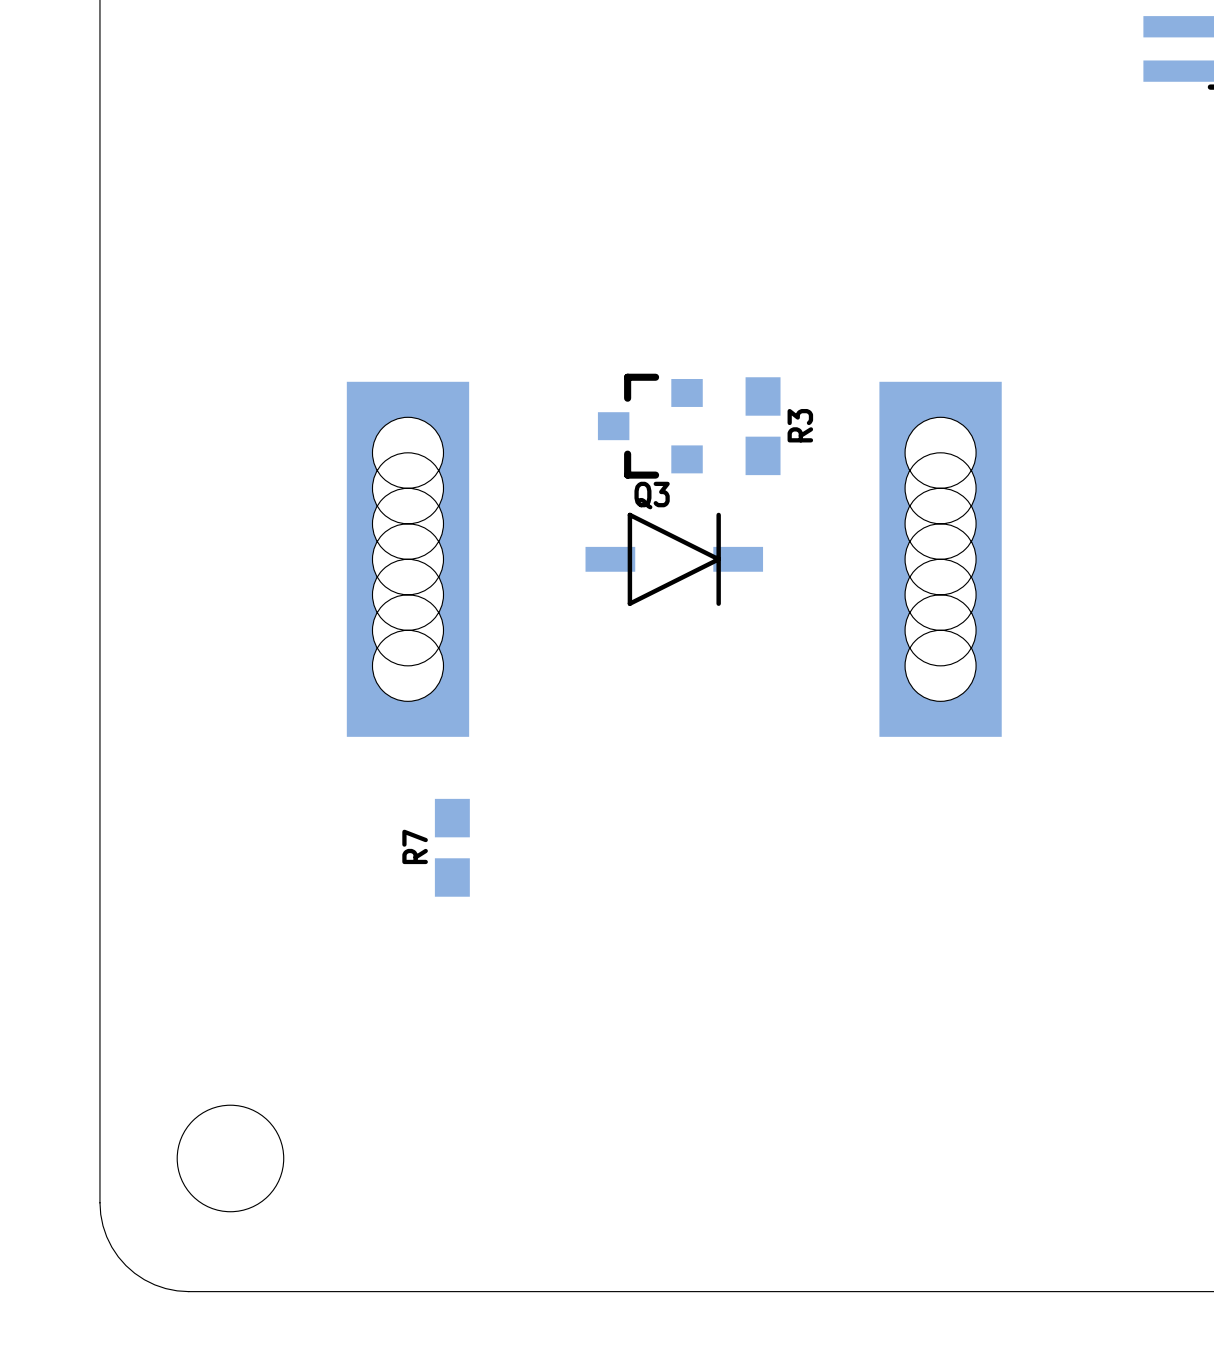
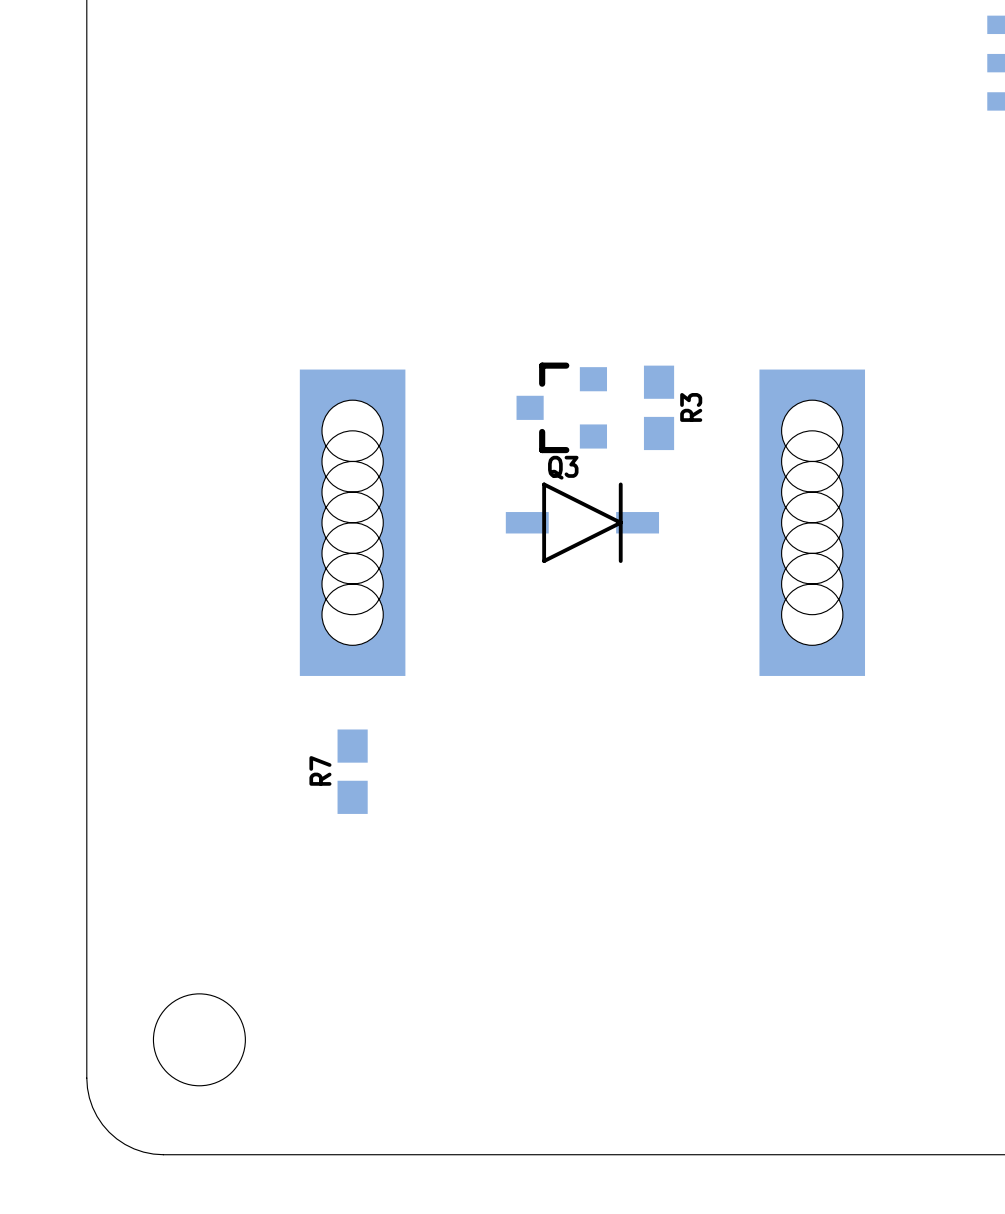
R7 position: (452, 847) -> (352, 771)

